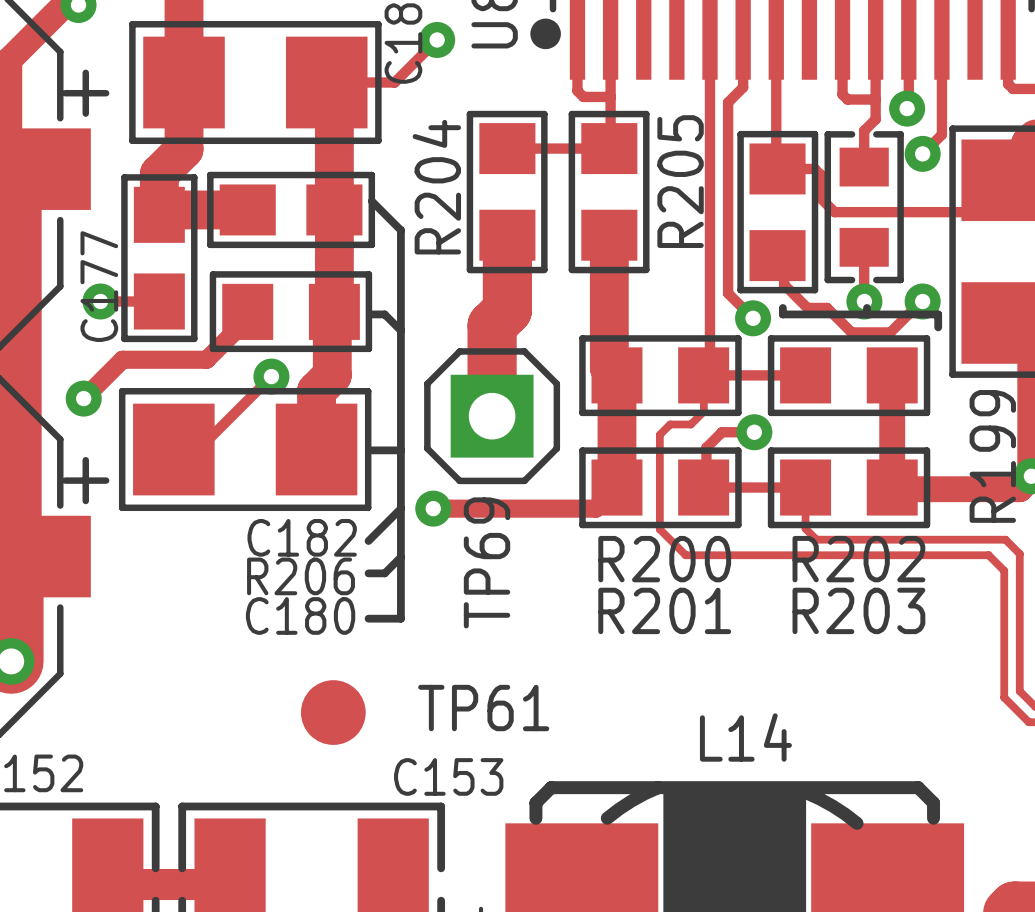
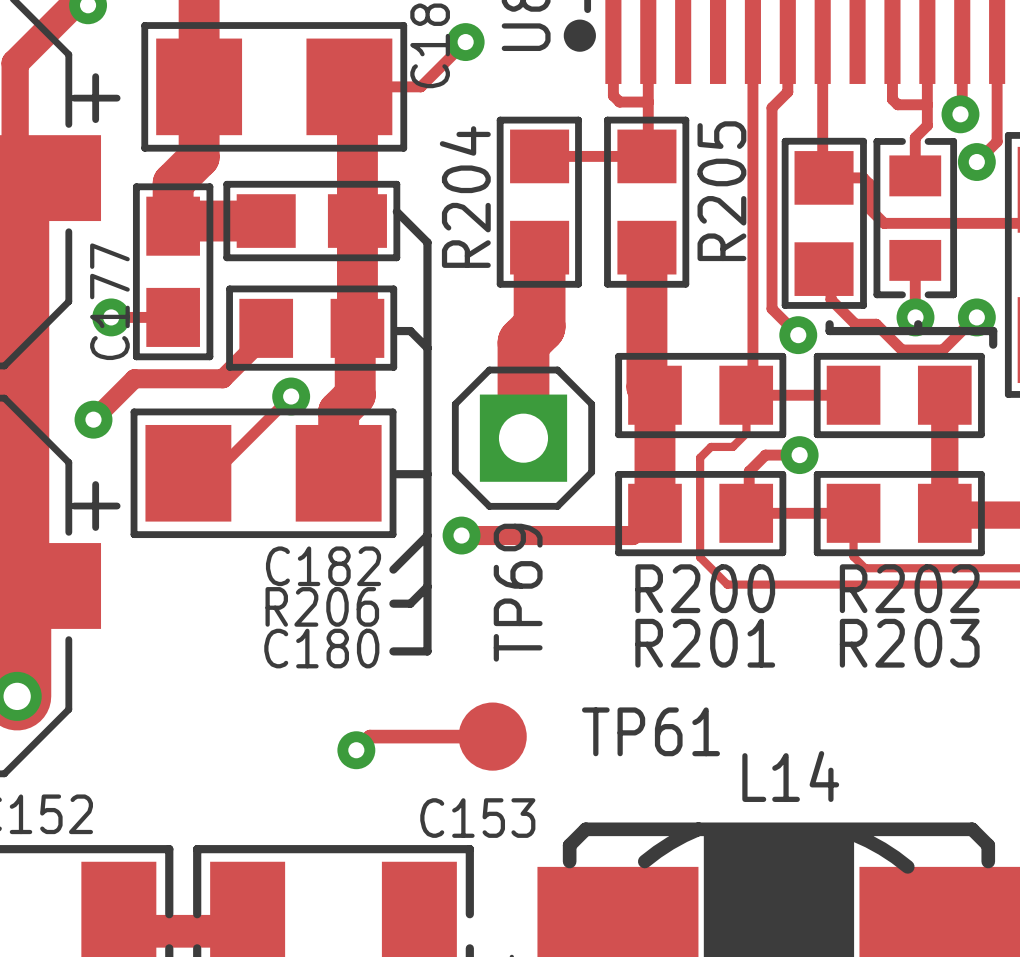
track: none -> (492, 736) (369, 736) (356, 750)
TP61 position: (333, 712) -> (492, 736)
via: none -> (356, 750)

